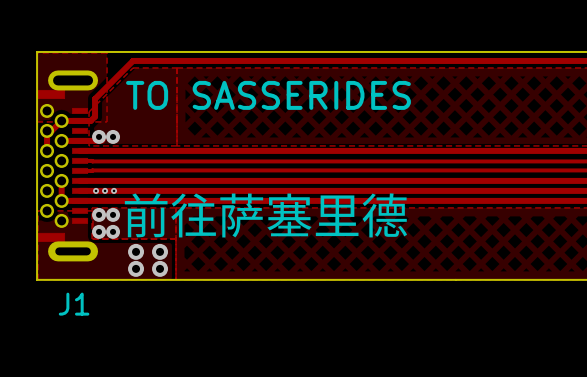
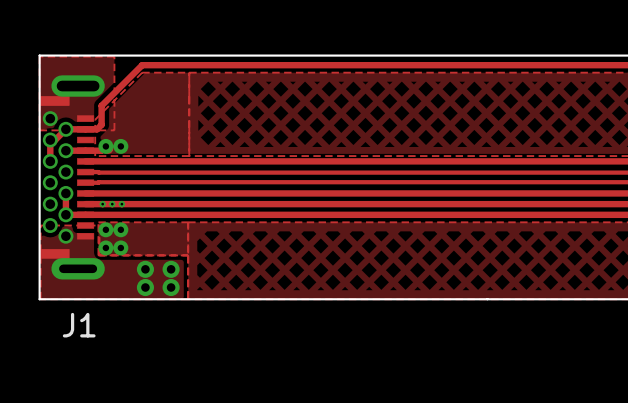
text: TO SASSERIDES (268, 95) -> none
text: 前往萨塞里德 (265, 215) -> none

